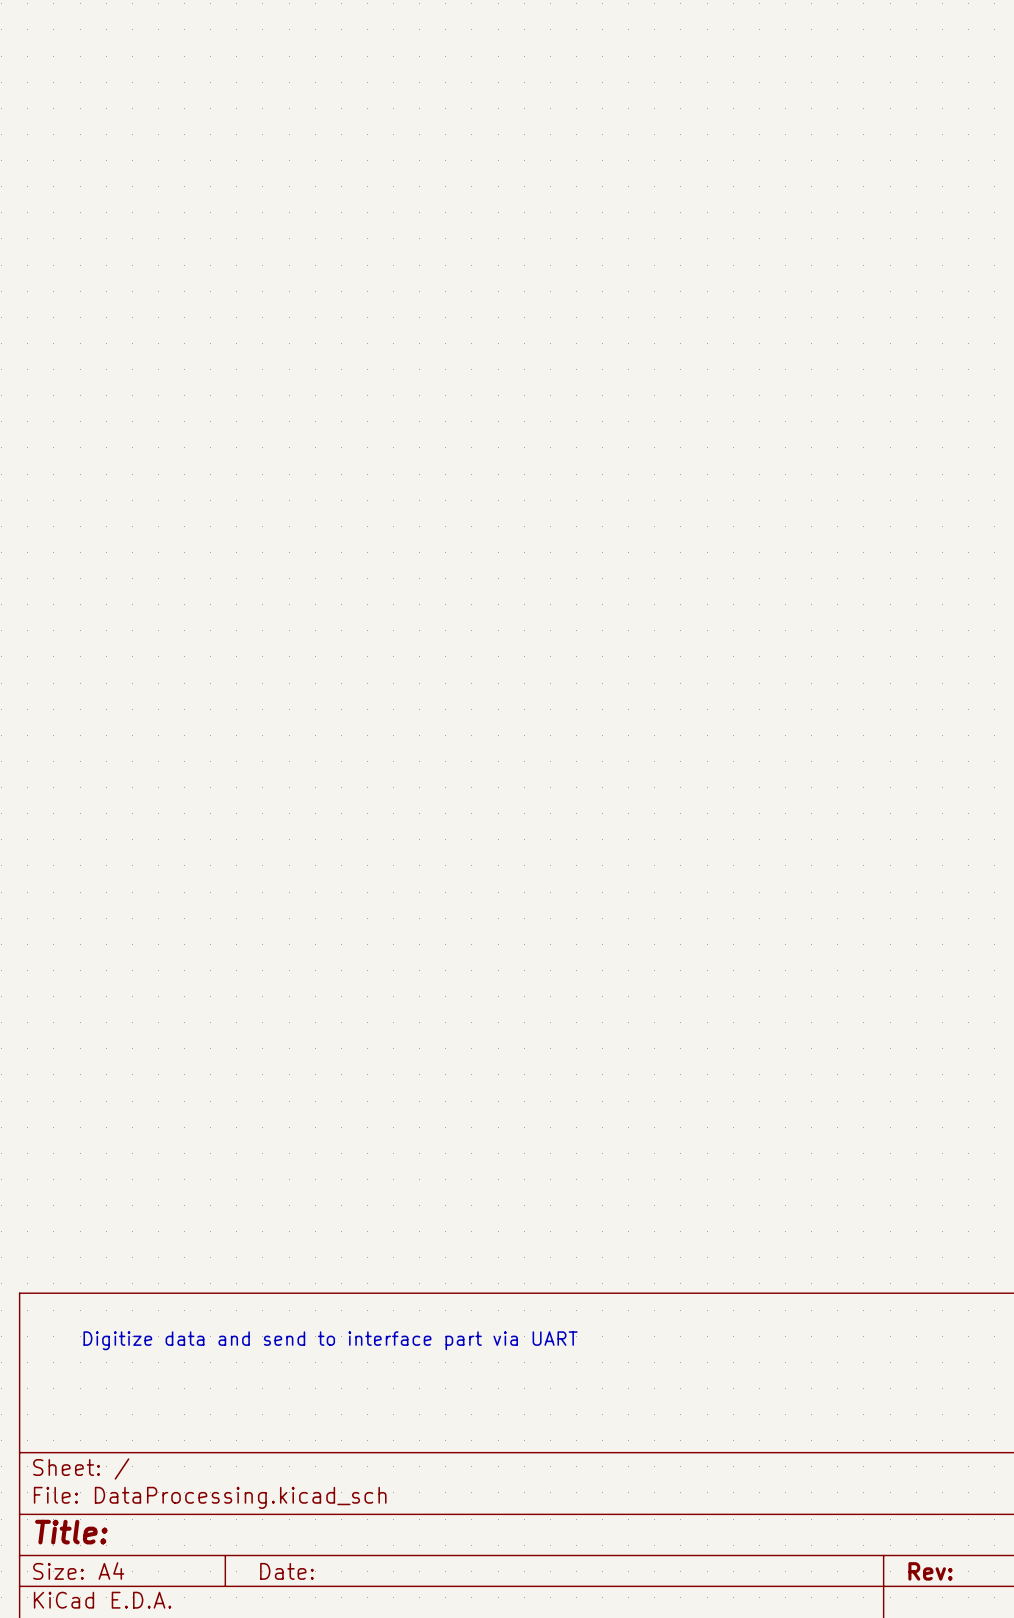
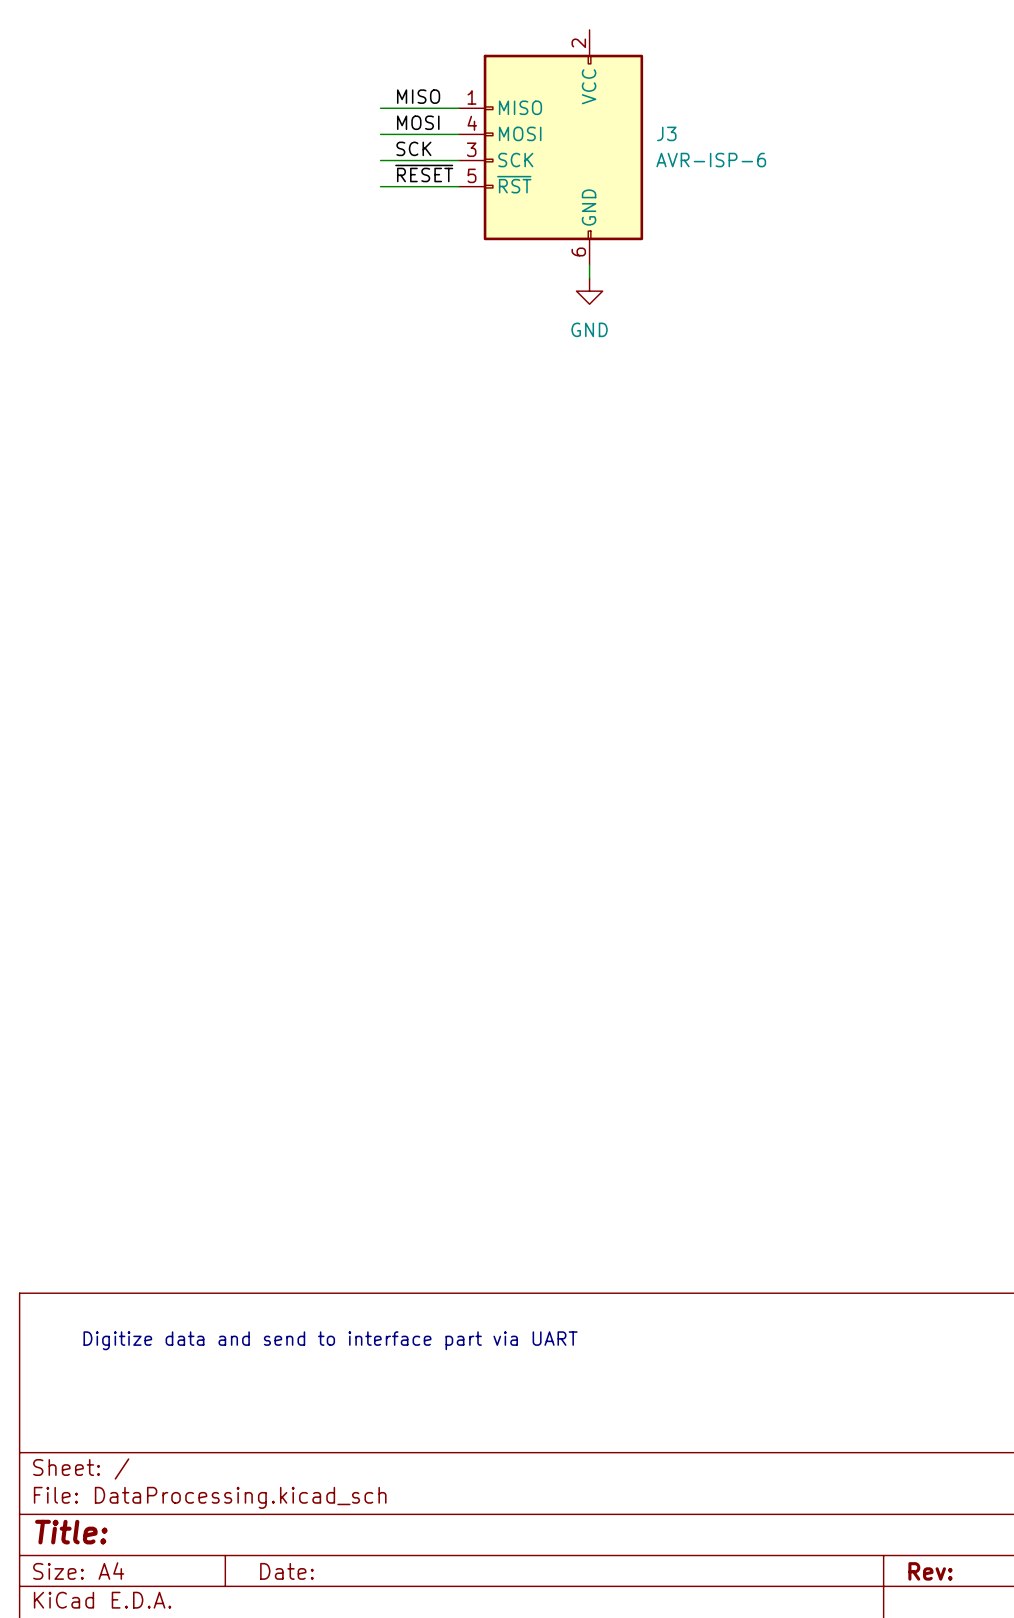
label: none -> MISO (418, 96)
wire: none -> (380, 108) (458, 108)
label: none -> MOSI (418, 122)
wire: none -> (380, 134) (458, 134)
J3: none -> AVR-ISP-6 (551, 147)
label: none -> SCK (413, 148)
wire: none -> (380, 160) (458, 160)
label: none -> ~{RESET} (424, 173)
wire: none -> (380, 186) (458, 186)
wire: none -> (589, 265) (589, 278)
power symbol: none -> GND (589, 291)

